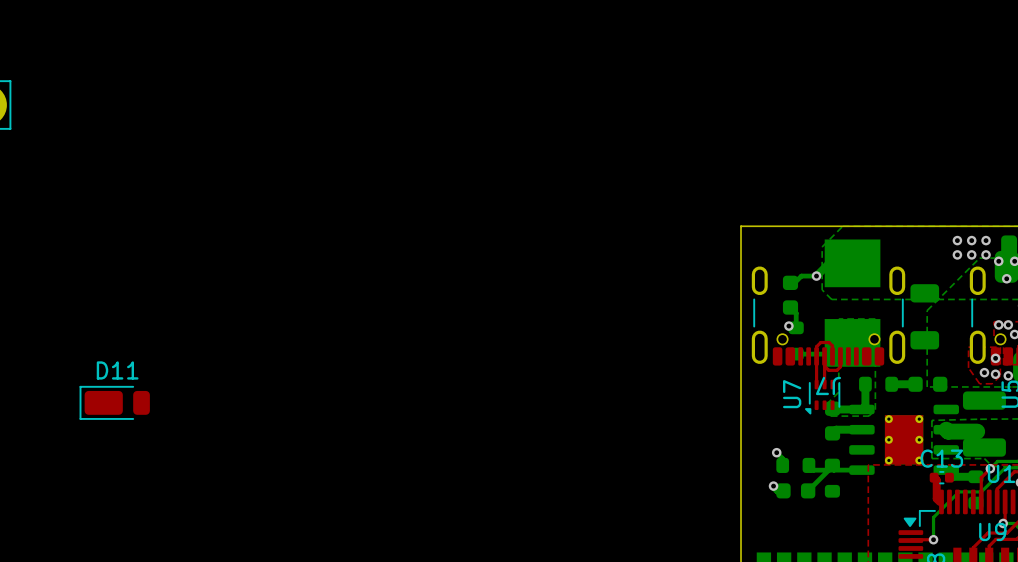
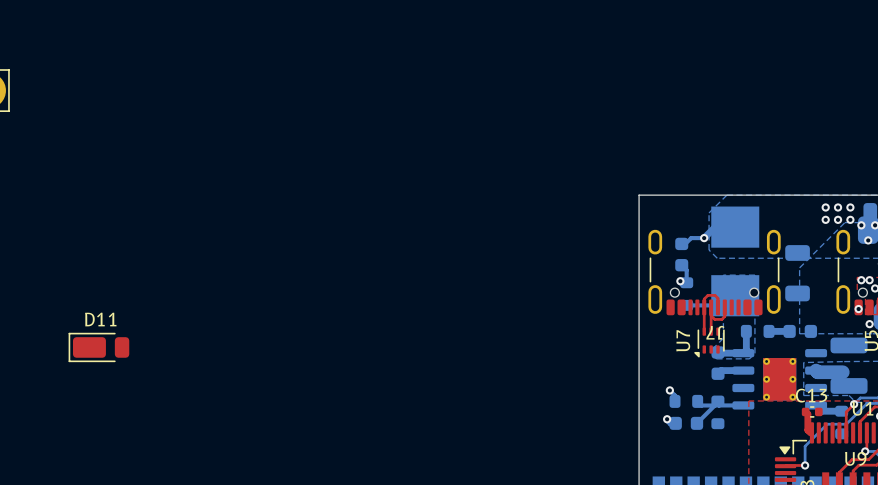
top zone outline: (968, 347) (968, 367) (979, 383) (992, 383) (1000, 375) (1000, 347) (968, 347) -> none
via: (984, 372) -> none
via: (995, 374) -> none

